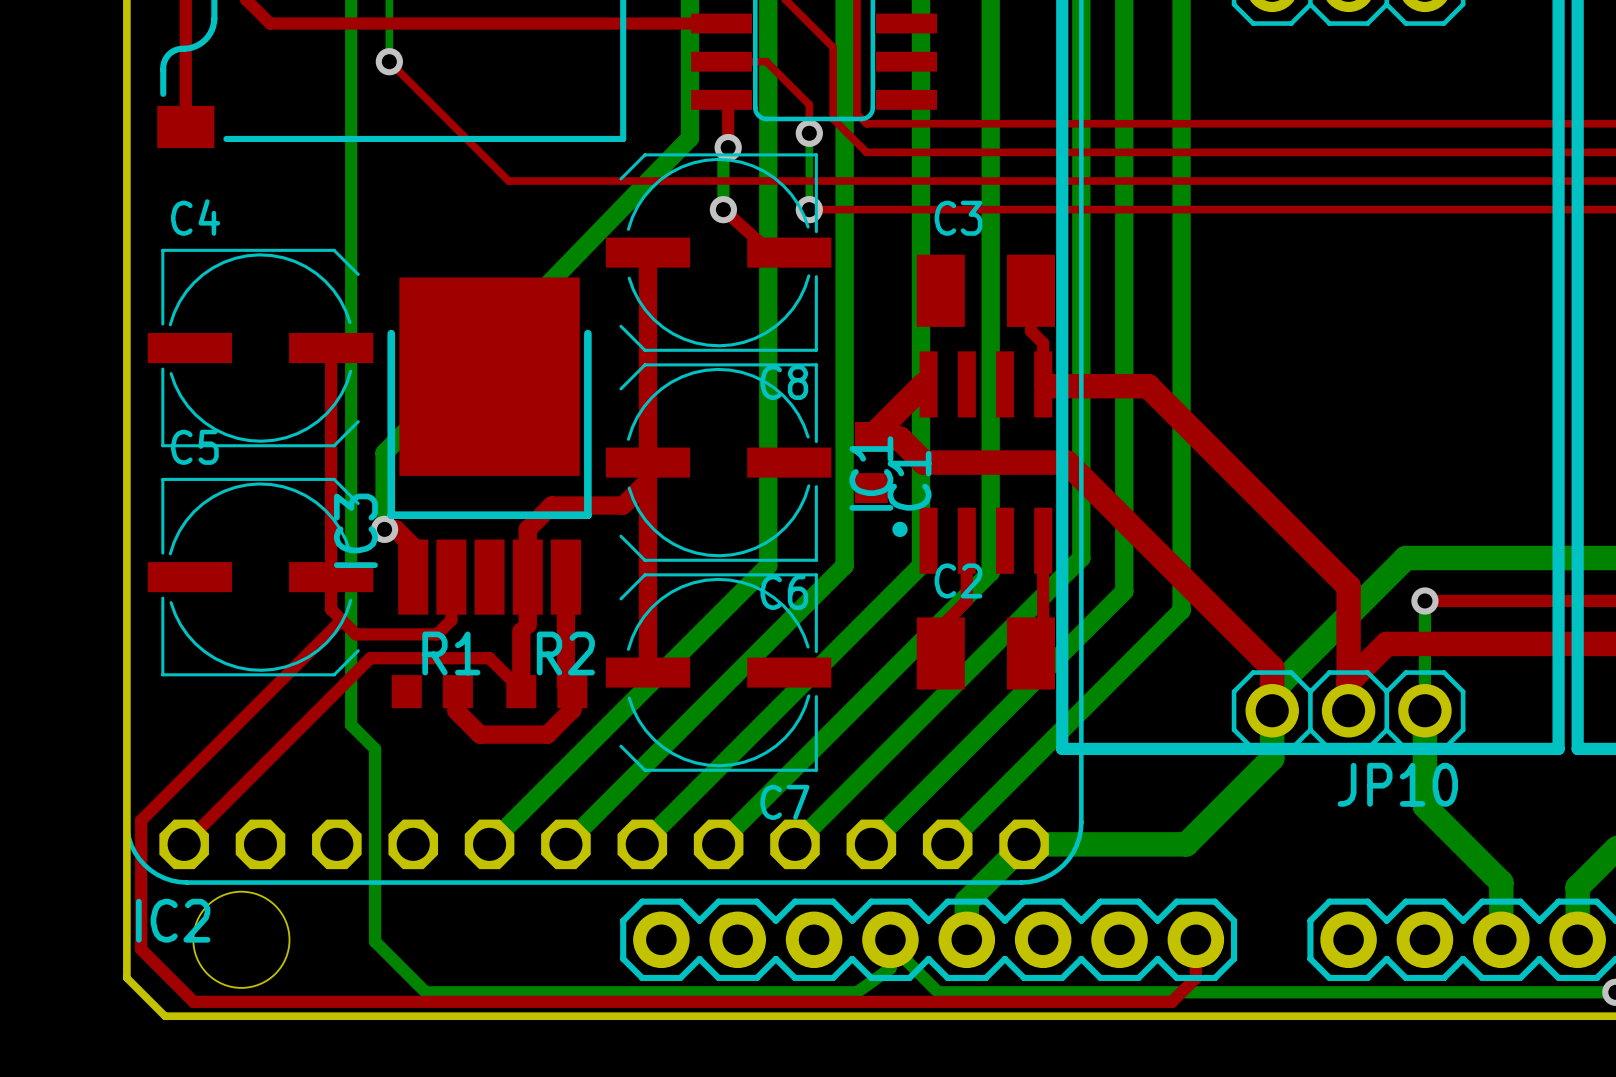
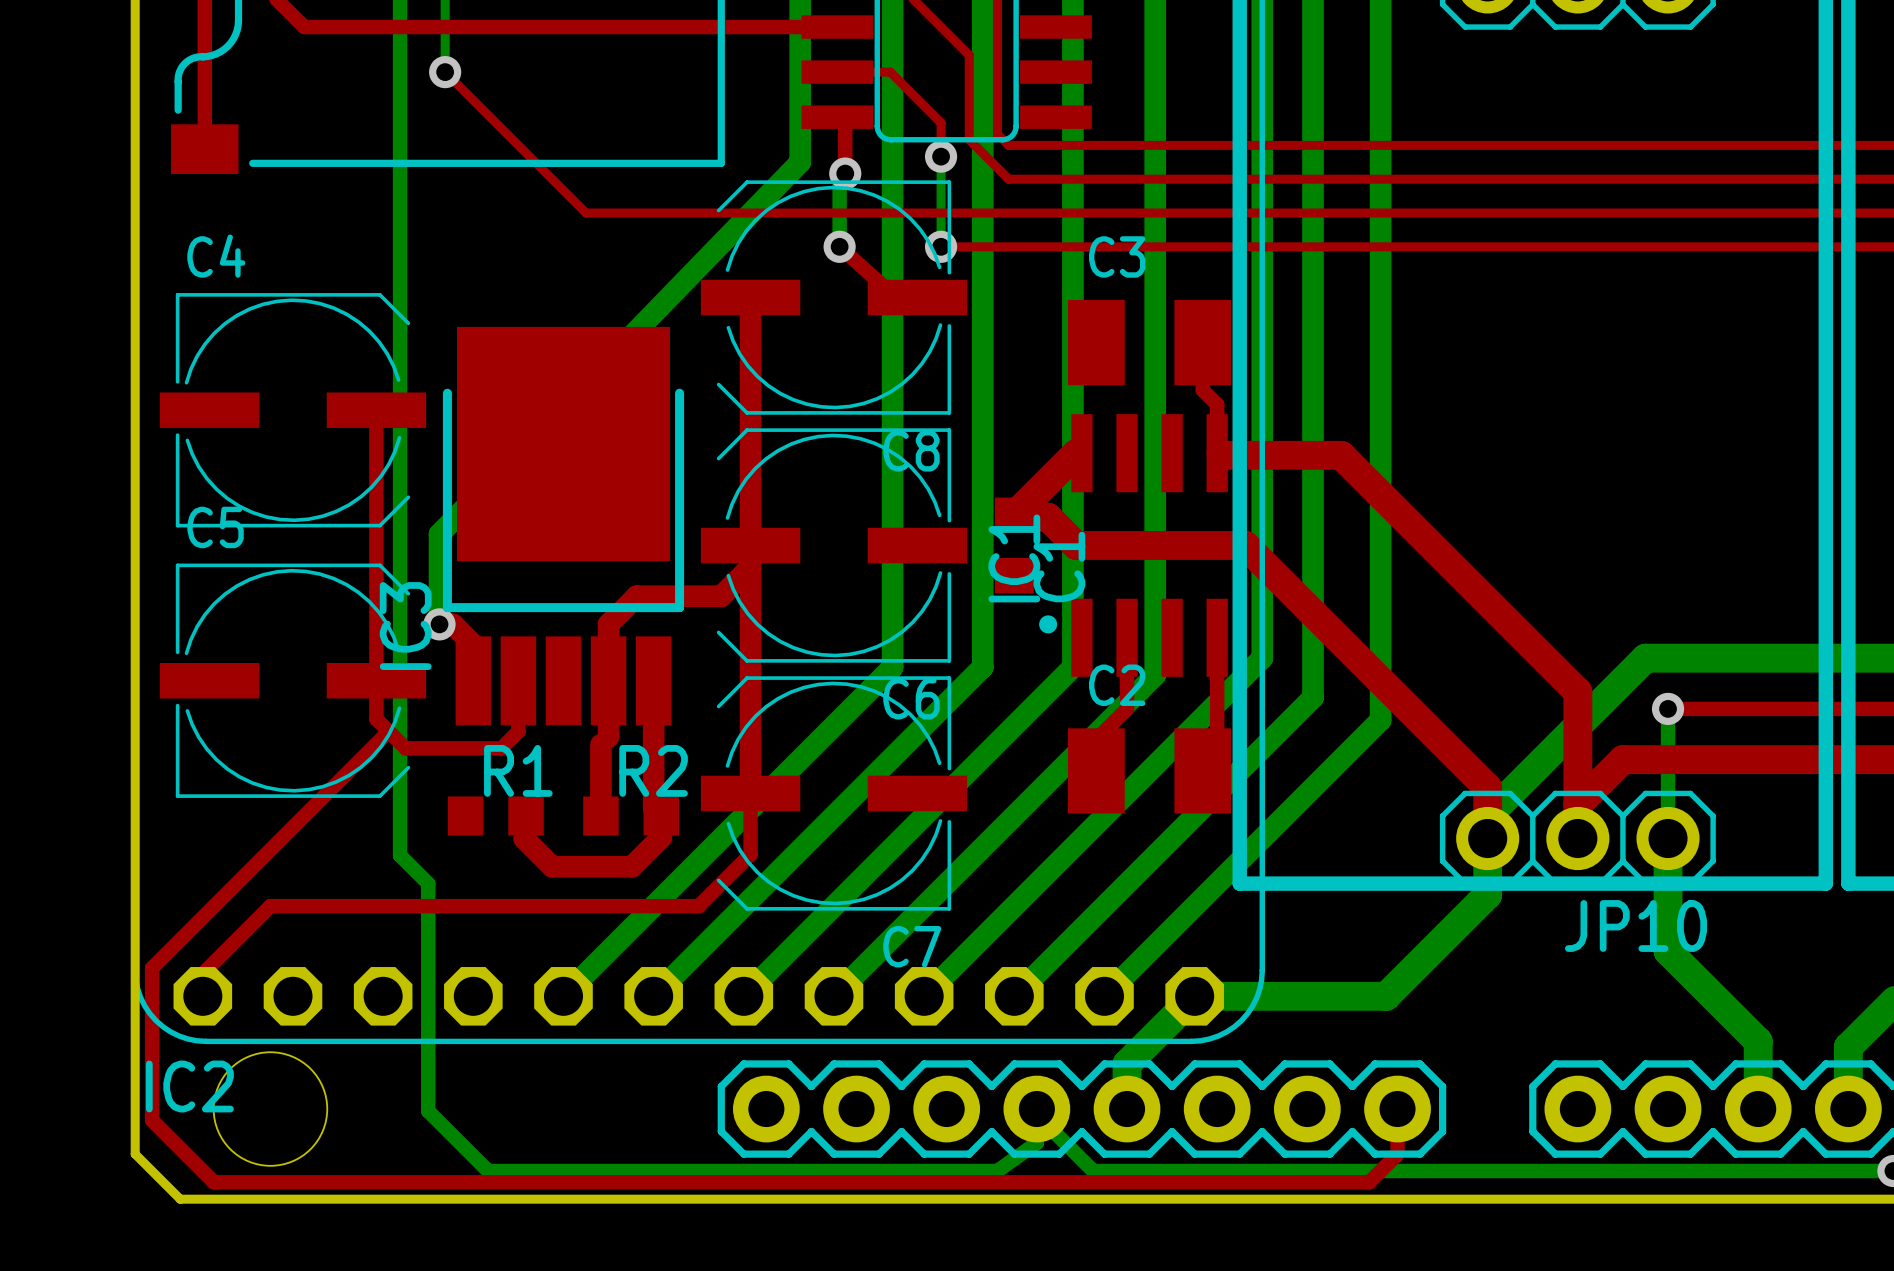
top track: (521, 689) (489, 658) (370, 658) (184, 844) -> (750, 793) (750, 854) (698, 906) (270, 906) (202, 973) (202, 996)

